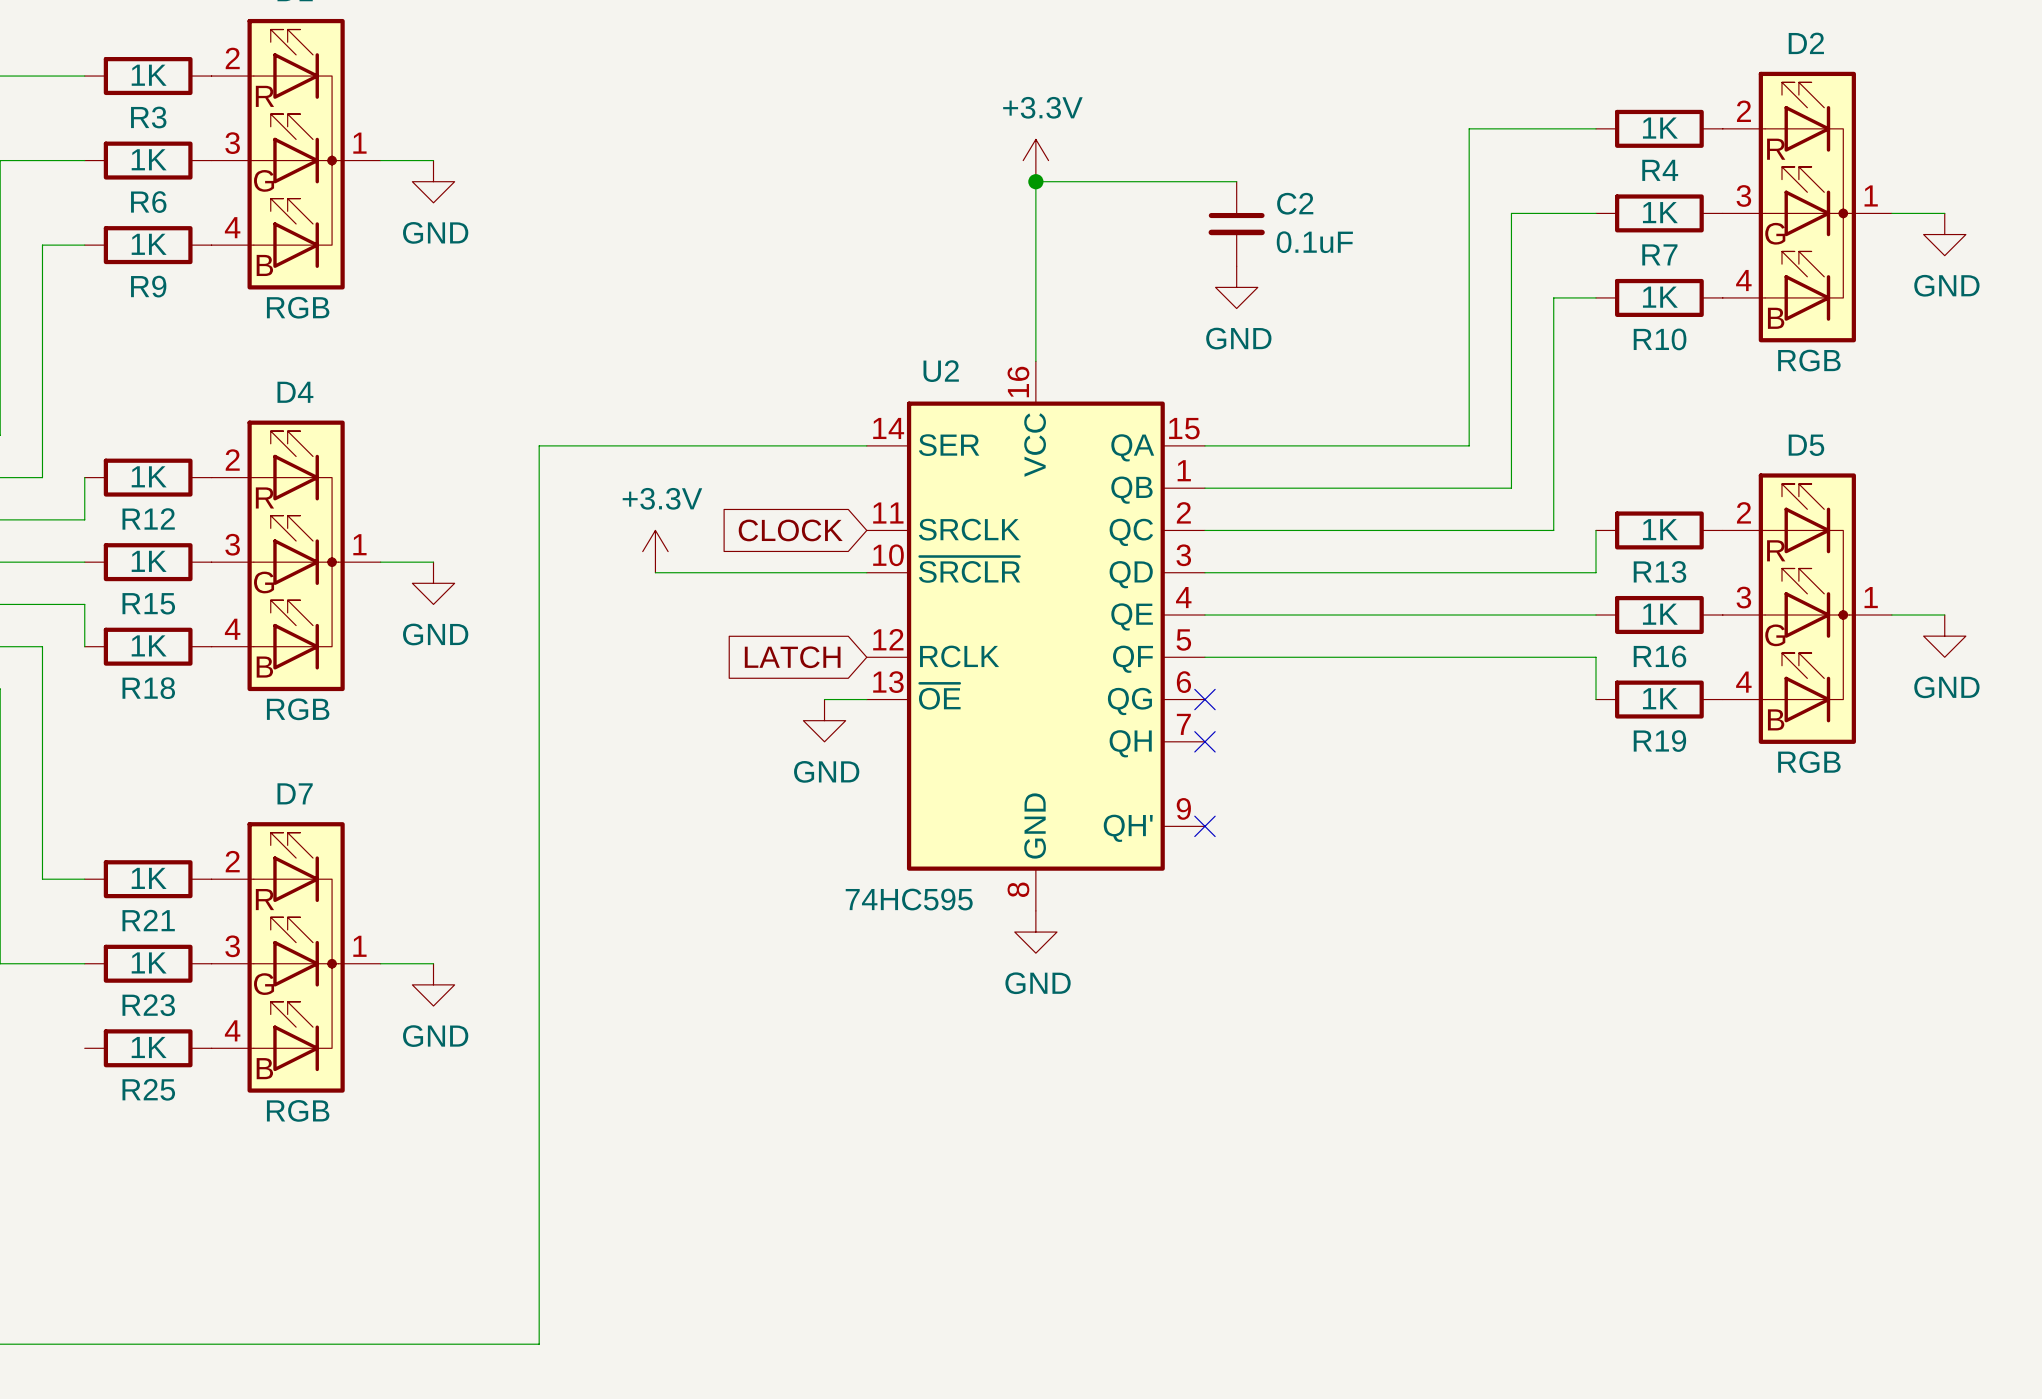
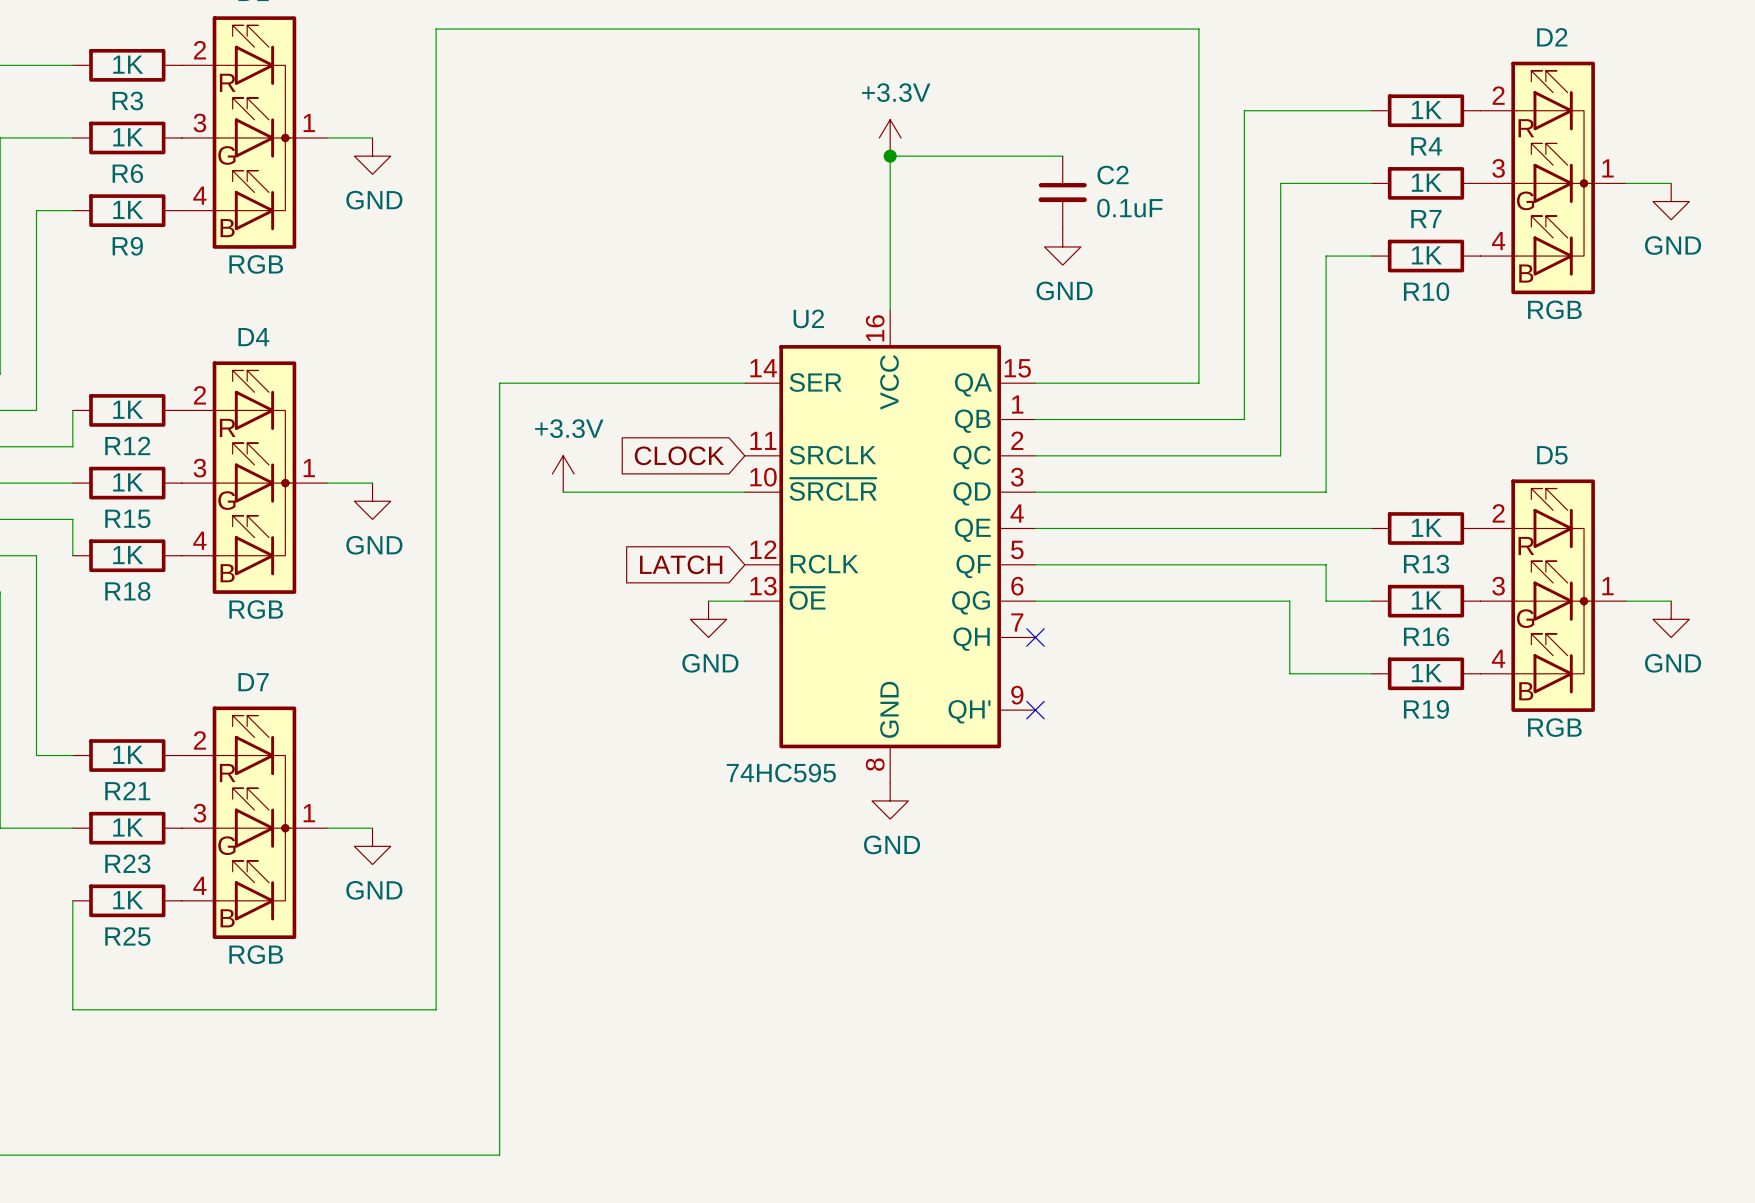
wire: (1469, 128) (1469, 445) (1395, 445) -> (1262, 110) (1244, 110) (1244, 419)
wire: (1511, 213) (1511, 488) (1448, 488) -> (1298, 183) (1280, 183) (1280, 455)
wire: (1553, 297) (1553, 530) (1490, 530) -> (1335, 256) (1326, 256) (1326, 492)
wire: (581, 445) (539, 445) (539, 1344) -> (499, 383) (499, 1155) (463, 1155)
wire: none -> (1198, 383) (1198, 29) (436, 29) (436, 1009) (72, 1009) (72, 900)
wire: (1595, 530) (1595, 572) (1543, 572) -> none
R13: 1K (1659, 530) -> none
D5 position: (1807, 608) -> (1553, 595)
wire: (1891, 615) (1944, 615) -> (1625, 601) (1671, 601)
power symbol position: GND (1944, 636) -> GND (1671, 619)
R16 name: R16 (1659, 656) -> R13 (1426, 564)
wire: (1543, 657) (1595, 657) (1595, 699) -> (1326, 564) (1326, 601) (1371, 601)
wire: none -> (1035, 601) (1289, 601) (1289, 673) (1371, 673)
no-connect mark: (1204, 699) -> none
R19 name: R19 (1659, 741) -> R16 (1426, 636)
R19: none -> 1K (1425, 673)

